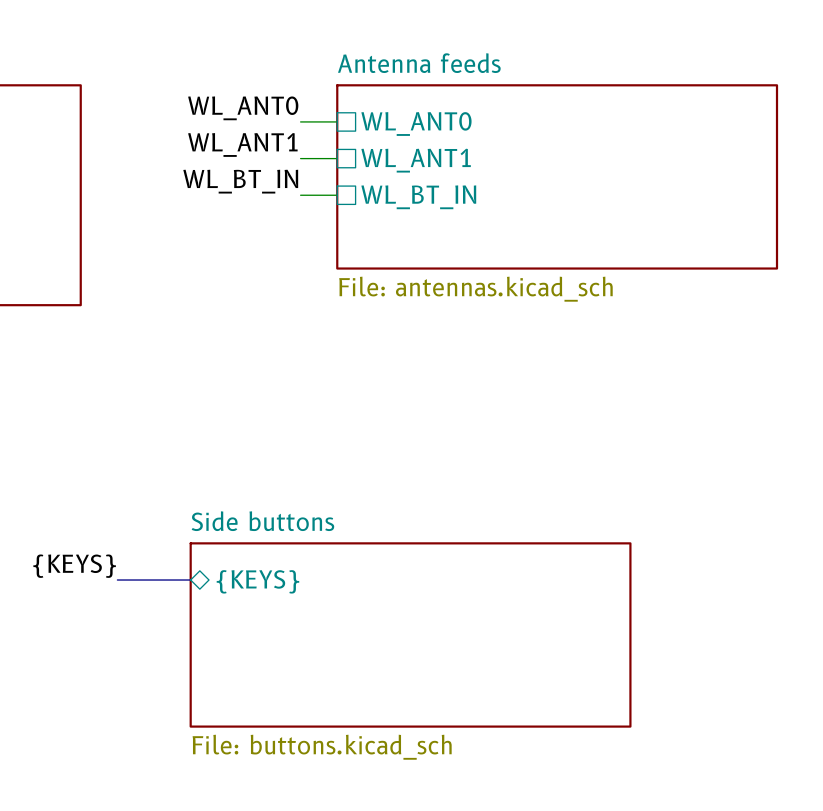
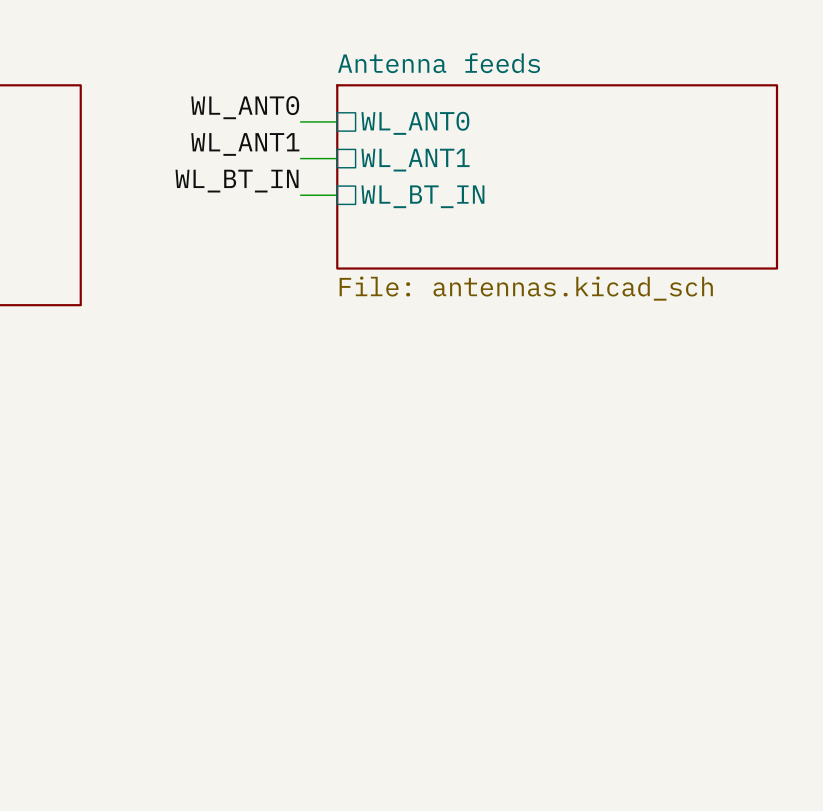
label: {KEYS} (74, 566) -> none
bus: (117, 580) (190, 580) -> none
sheet pin: {KEYS} (257, 581) -> none
sheet Side buttons: File: buttons.kicad_sch (410, 634) -> none

